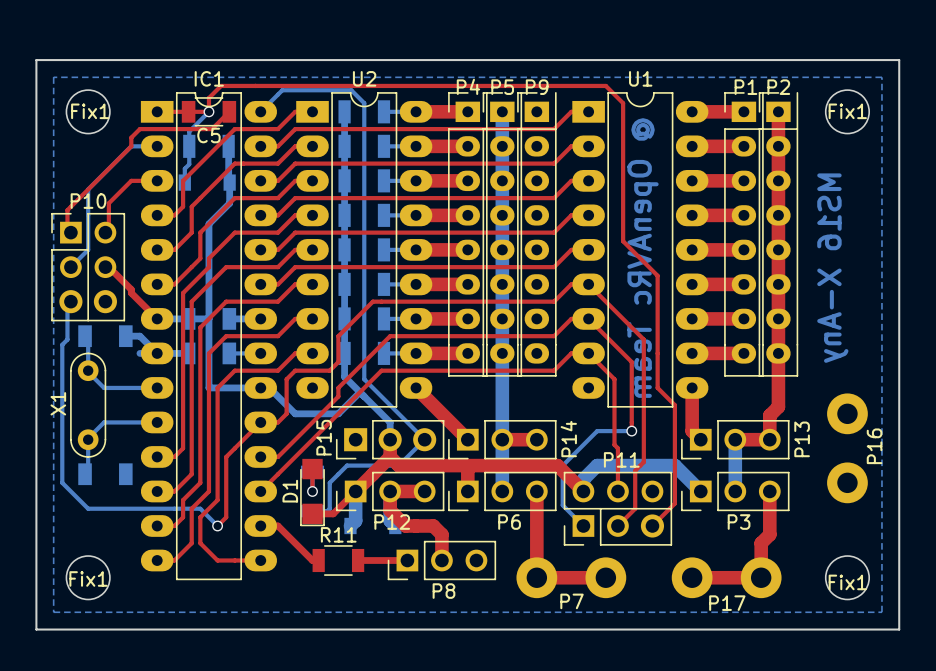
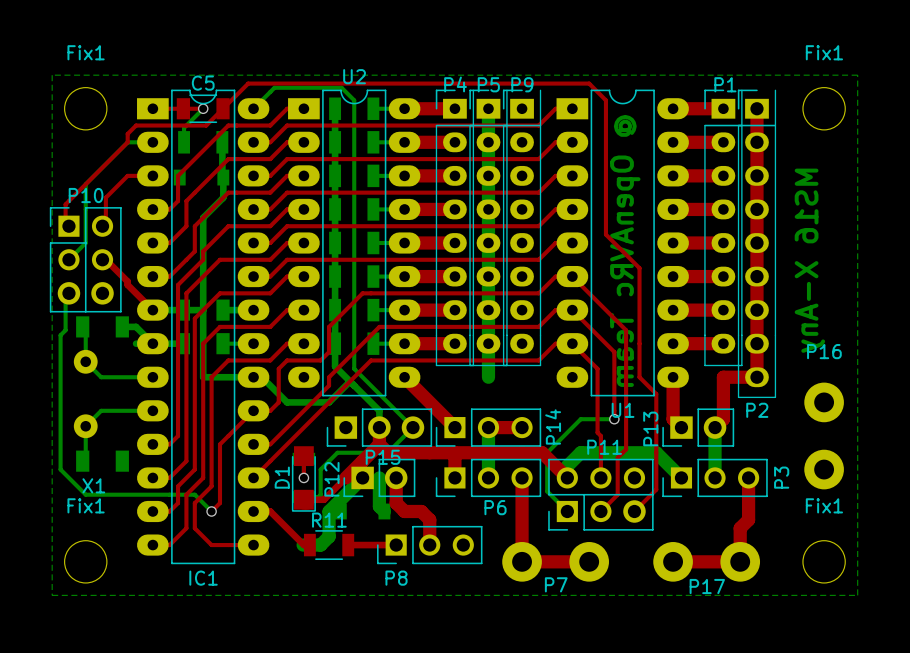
board edge: (36, 60) (899, 60) (899, 629) (36, 629) (36, 60) -> none
IC1 name position: IC1 (209, 78) -> IC1 (203, 578)
U1 name position: U1 (640, 78) -> U1 (623, 410)
top track: (255, 85) (221, 85) (208, 98) (208, 111) -> (248, 83) (223, 108)
P2 name position: P2 (778, 87) -> P2 (757, 410)
P2 footprint: [758, 92, 799, 377] -> [737, 89, 777, 399]
Fix1 name position: Fix1 (90, 111) -> Fix1 (86, 52)
Fix1 name position: Fix1 (847, 111) -> Fix1 (824, 52)
C5 name position: C5 (208, 135) -> C5 (203, 83)
bottom track: (189, 146) (189, 164) (184, 168) (184, 182) -> none
X1 footprint: [70, 352, 107, 458] -> [73, 349, 98, 439]
bottom track: (502, 387) (502, 439) -> none
top track: (778, 387) (778, 406) (769, 415) (769, 439) (735, 439) -> (756, 377) (723, 377) (723, 419) (715, 427)
X1 name position: X1 (58, 403) -> X1 (93, 485)
P13 footprint: [681, 420, 790, 460] -> [662, 408, 735, 447]
P15 name rotation: 0° (324, 437) -> 90° clockwise (383, 457)
P15 name position: P15 (324, 437) -> P15 (383, 457)
P13 name position: P13 (802, 439) -> P13 (650, 428)
P16 name rotation: 0° (874, 446) -> 90° clockwise (824, 351)
P16 name position: P16 (874, 446) -> P16 (824, 351)
P12 footprint: [335, 471, 445, 512] -> [343, 458, 416, 498]
bottom track: (355, 491) (355, 520) (350, 525) -> none
bottom track: none -> (362, 477) (329, 511) (329, 536) (320, 545) (303, 544)
top track: (424, 491) (390, 491) (390, 510) (405, 525) (416, 525) -> (396, 477) (396, 503) (404, 511)
P12 name position: P12 (392, 522) -> P12 (331, 479)
P3 name rotation: 0° (739, 522) -> 90° counterclockwise (781, 477)
P3 name position: P3 (739, 522) -> P3 (781, 477)
Fix1 name position: Fix1 (88, 578) -> Fix1 (86, 505)
Fix1 name position: Fix1 (847, 582) -> Fix1 (824, 505)
P8 name position: P8 (443, 591) -> P8 (396, 578)

